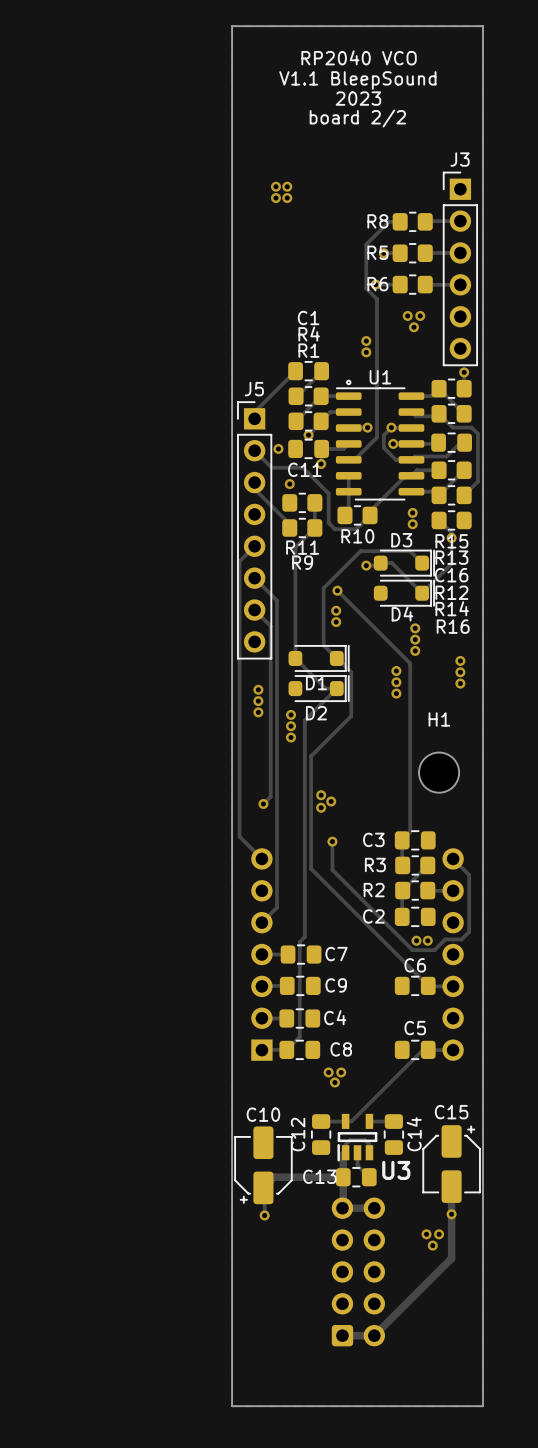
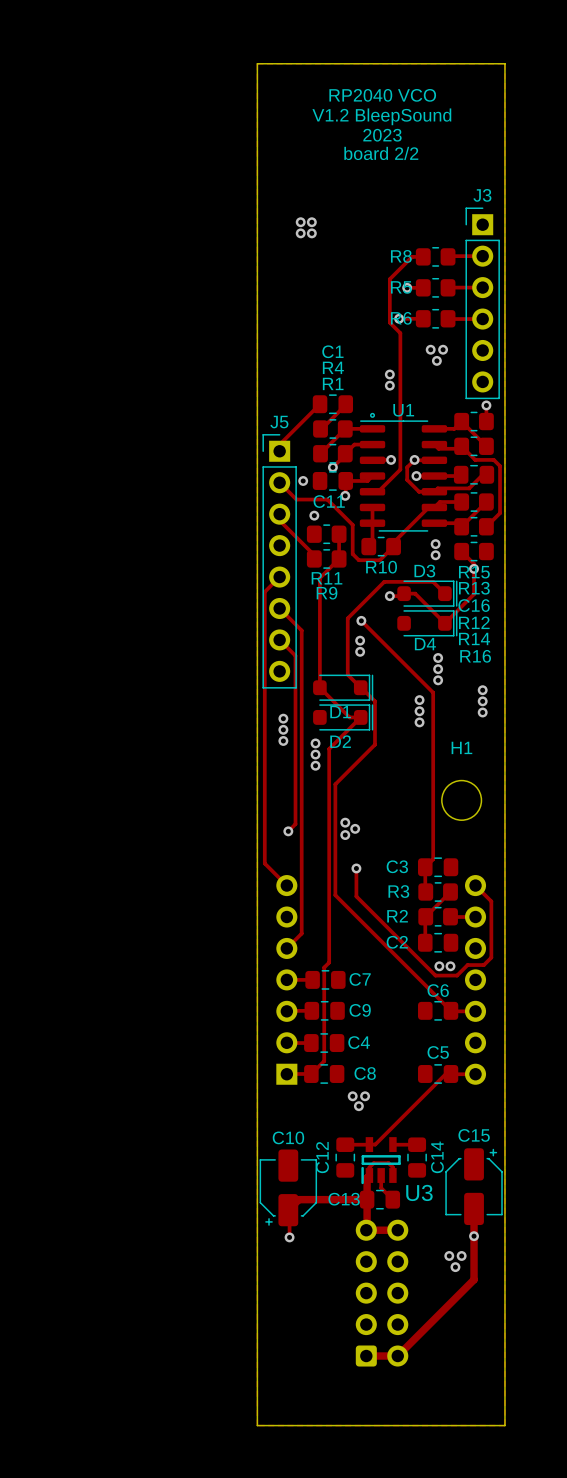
text: V1.1 BleepSound (357, 80) -> V1.2 BleepSound (381, 116)

